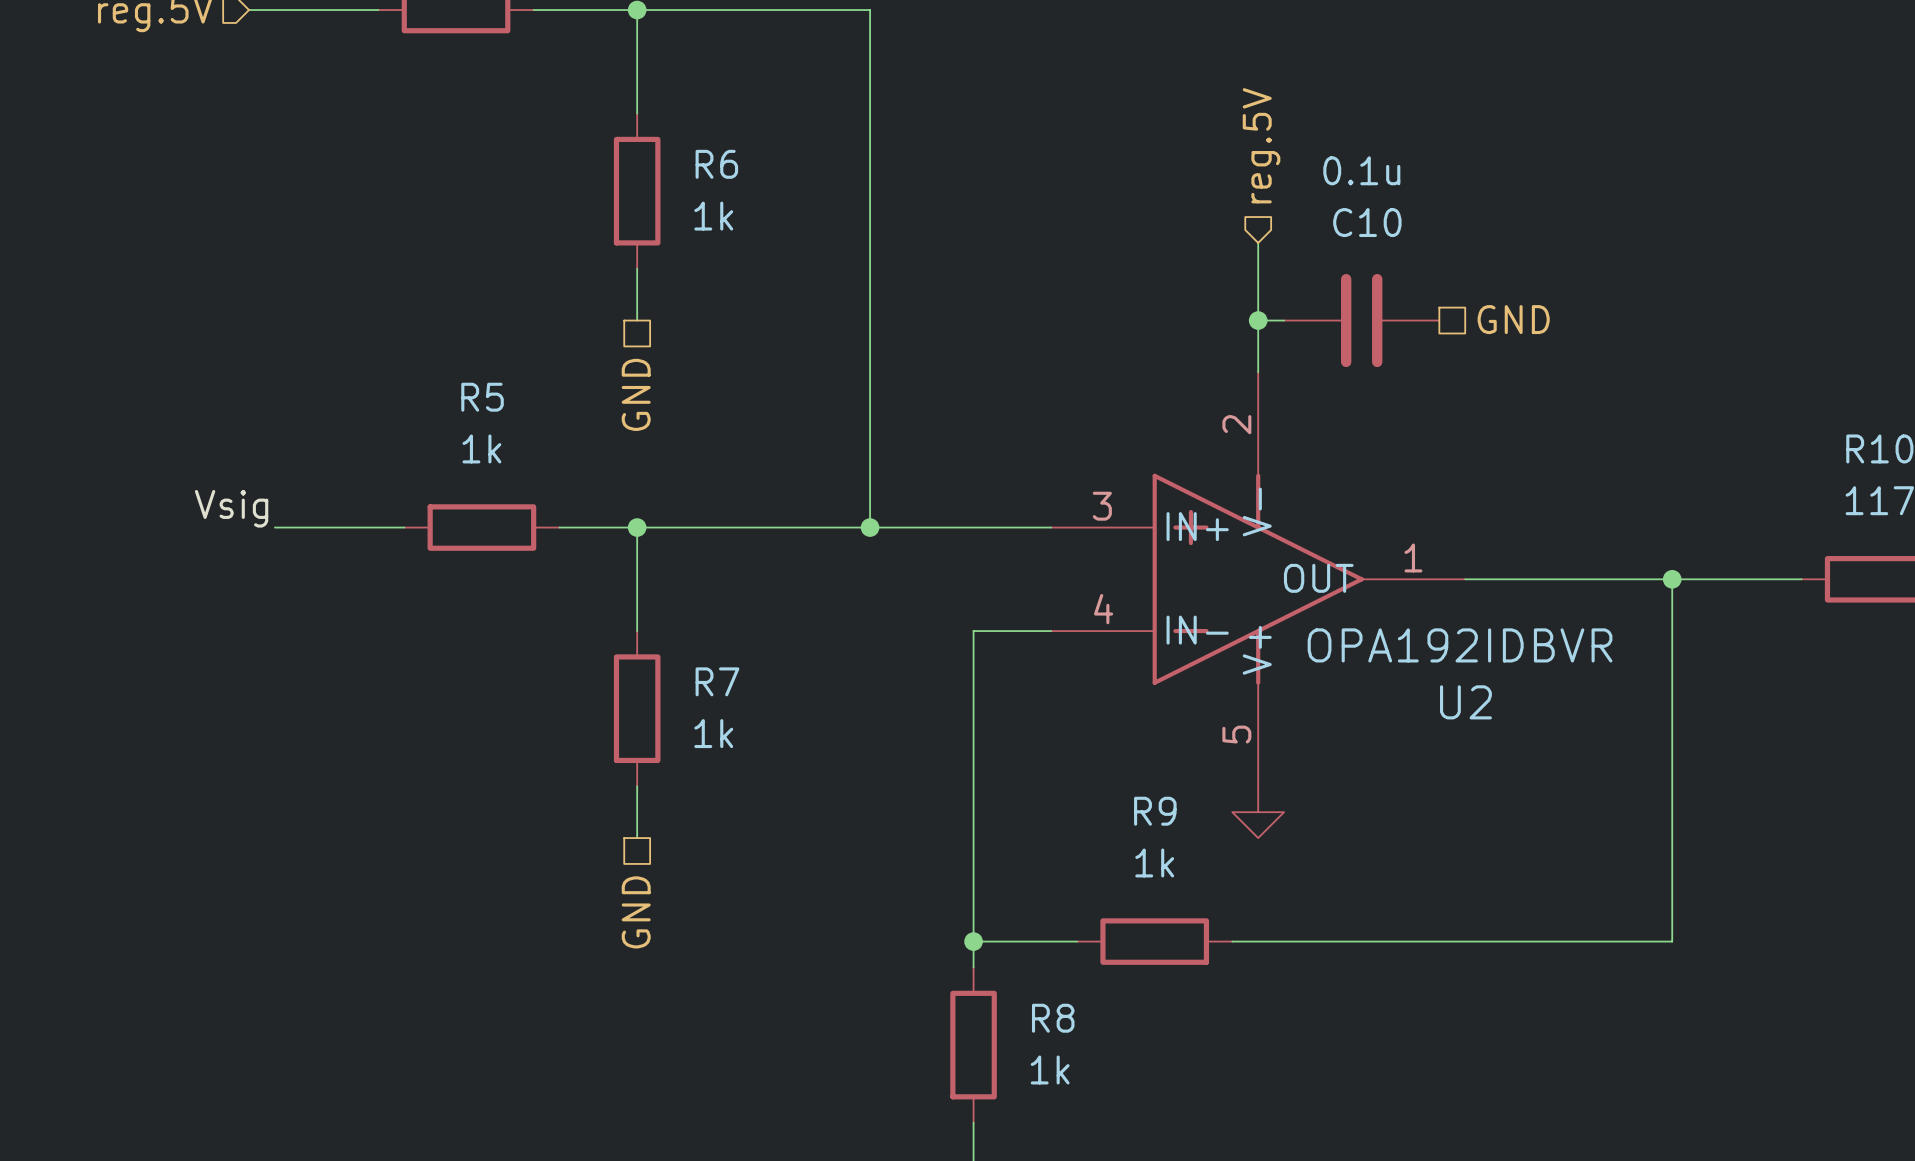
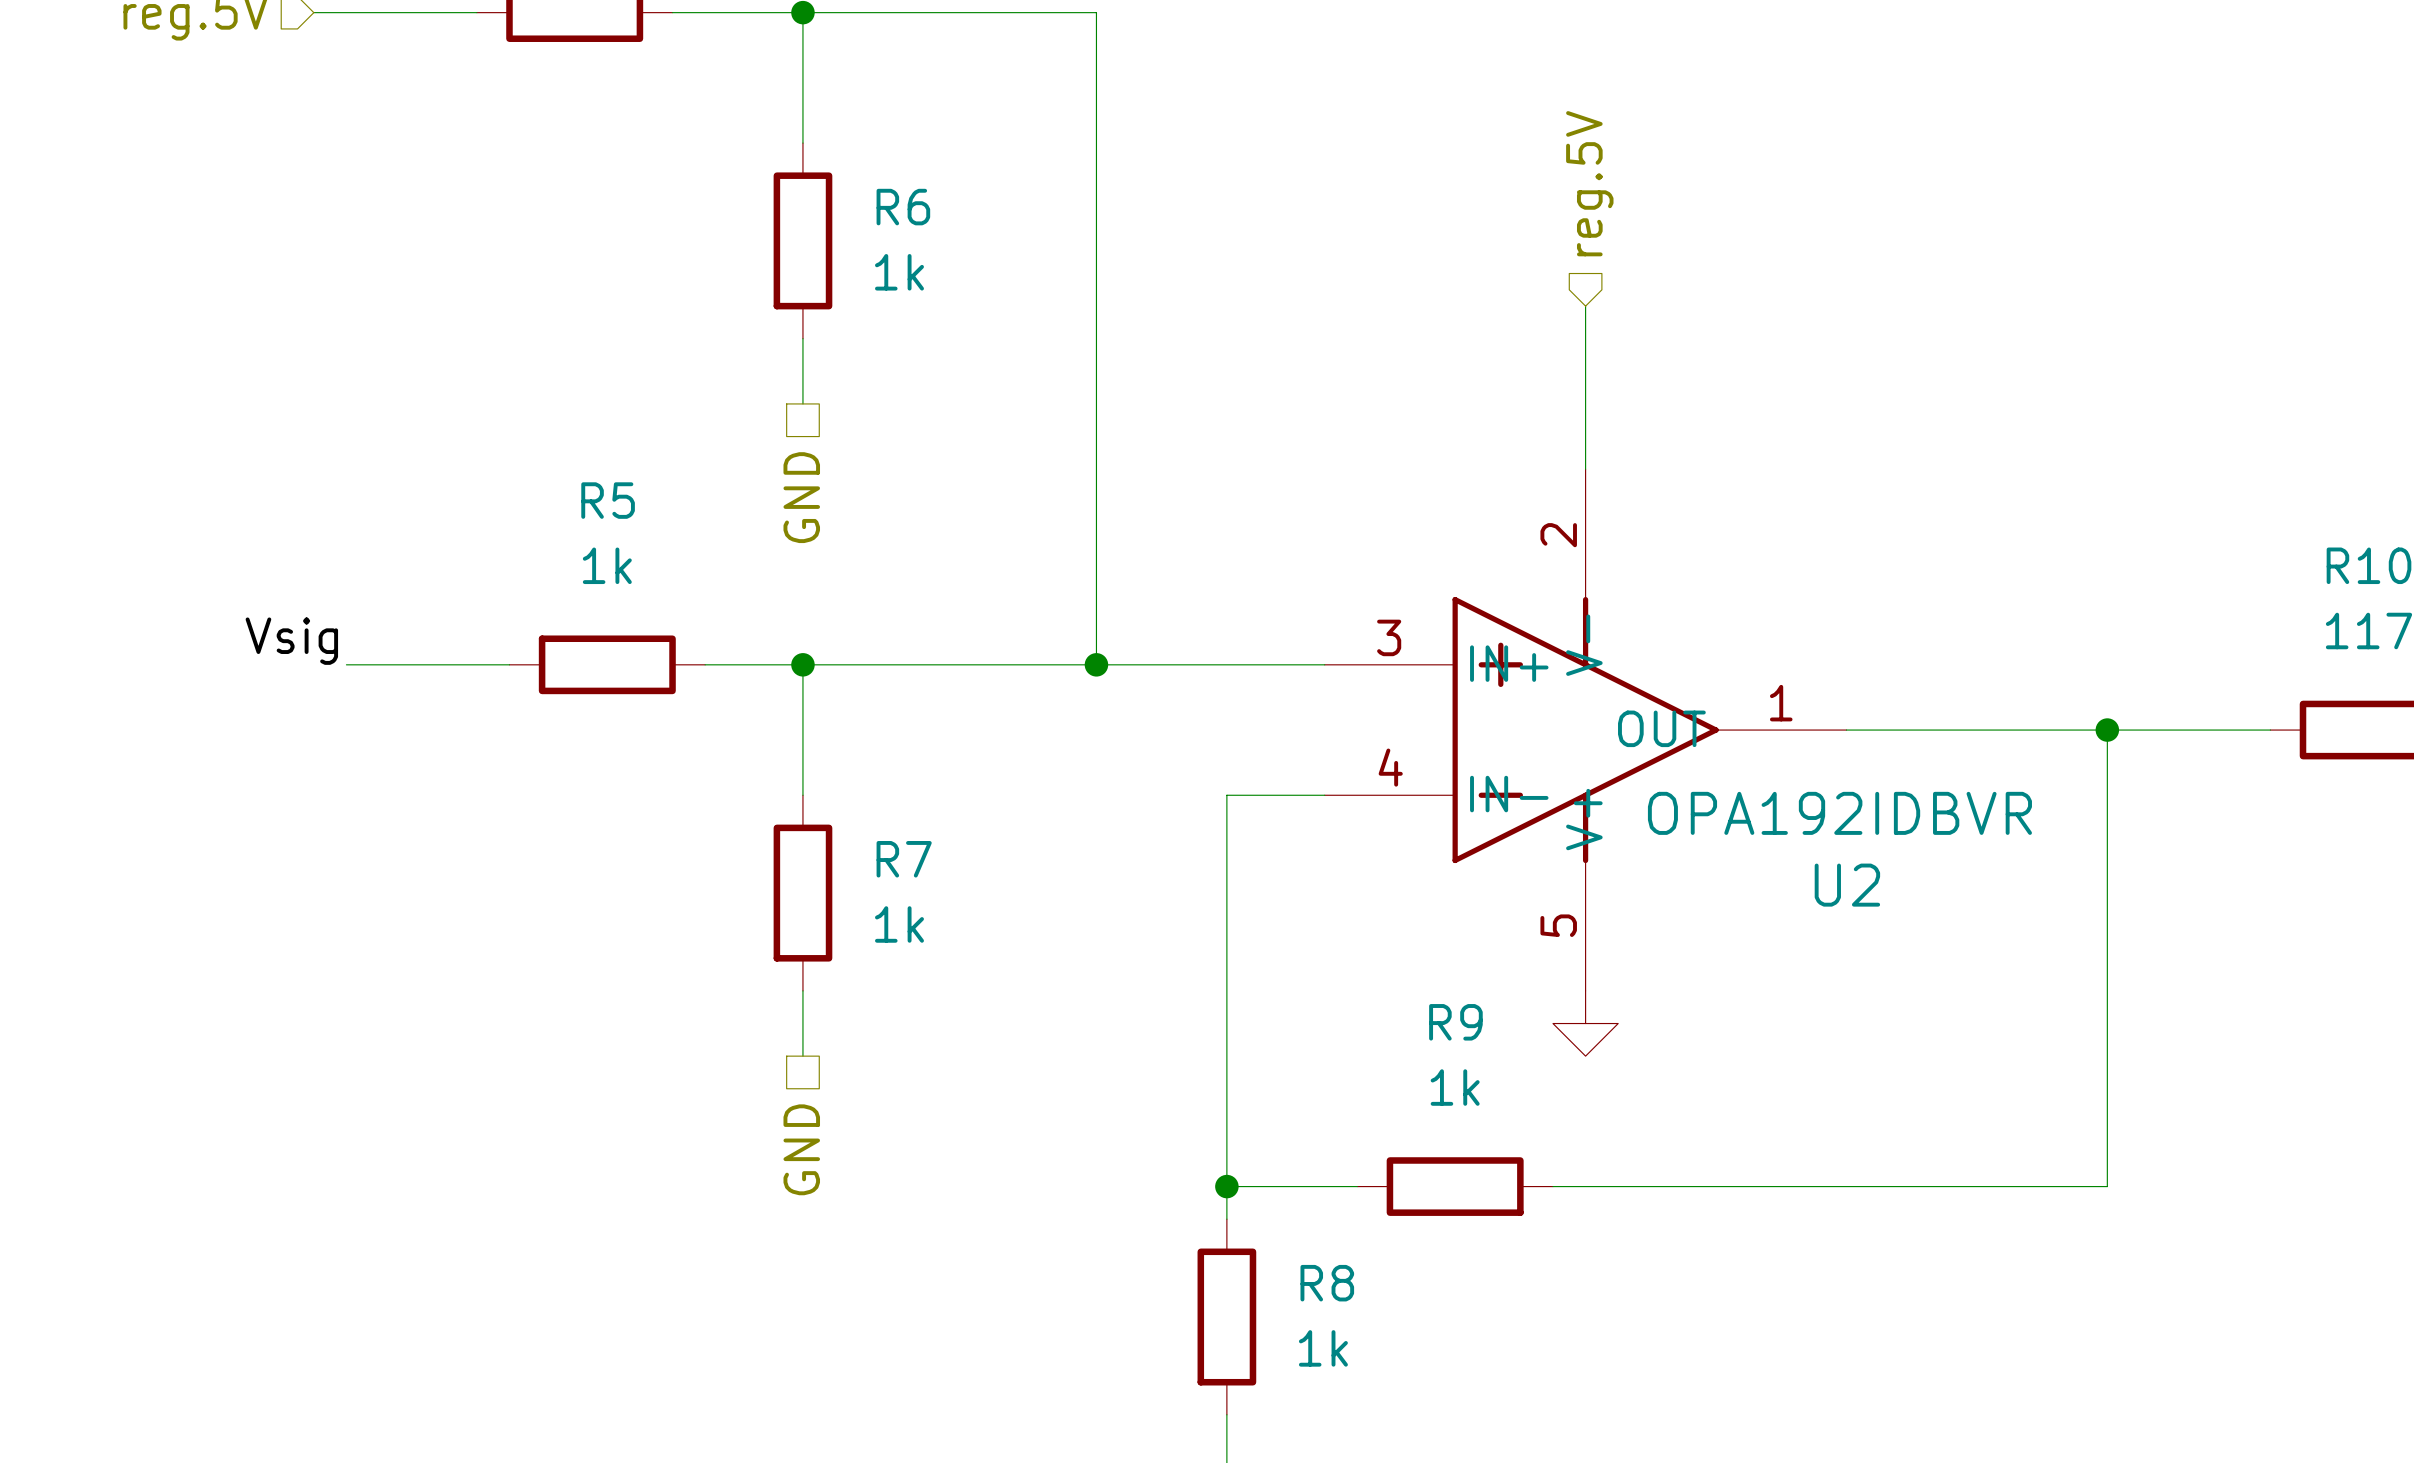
hierarchical label: GND (1513, 319) -> none
wire: (1258, 320) (1284, 320) -> none
junction: (1258, 320) -> none
C10: 0.1u (1361, 320) -> none

